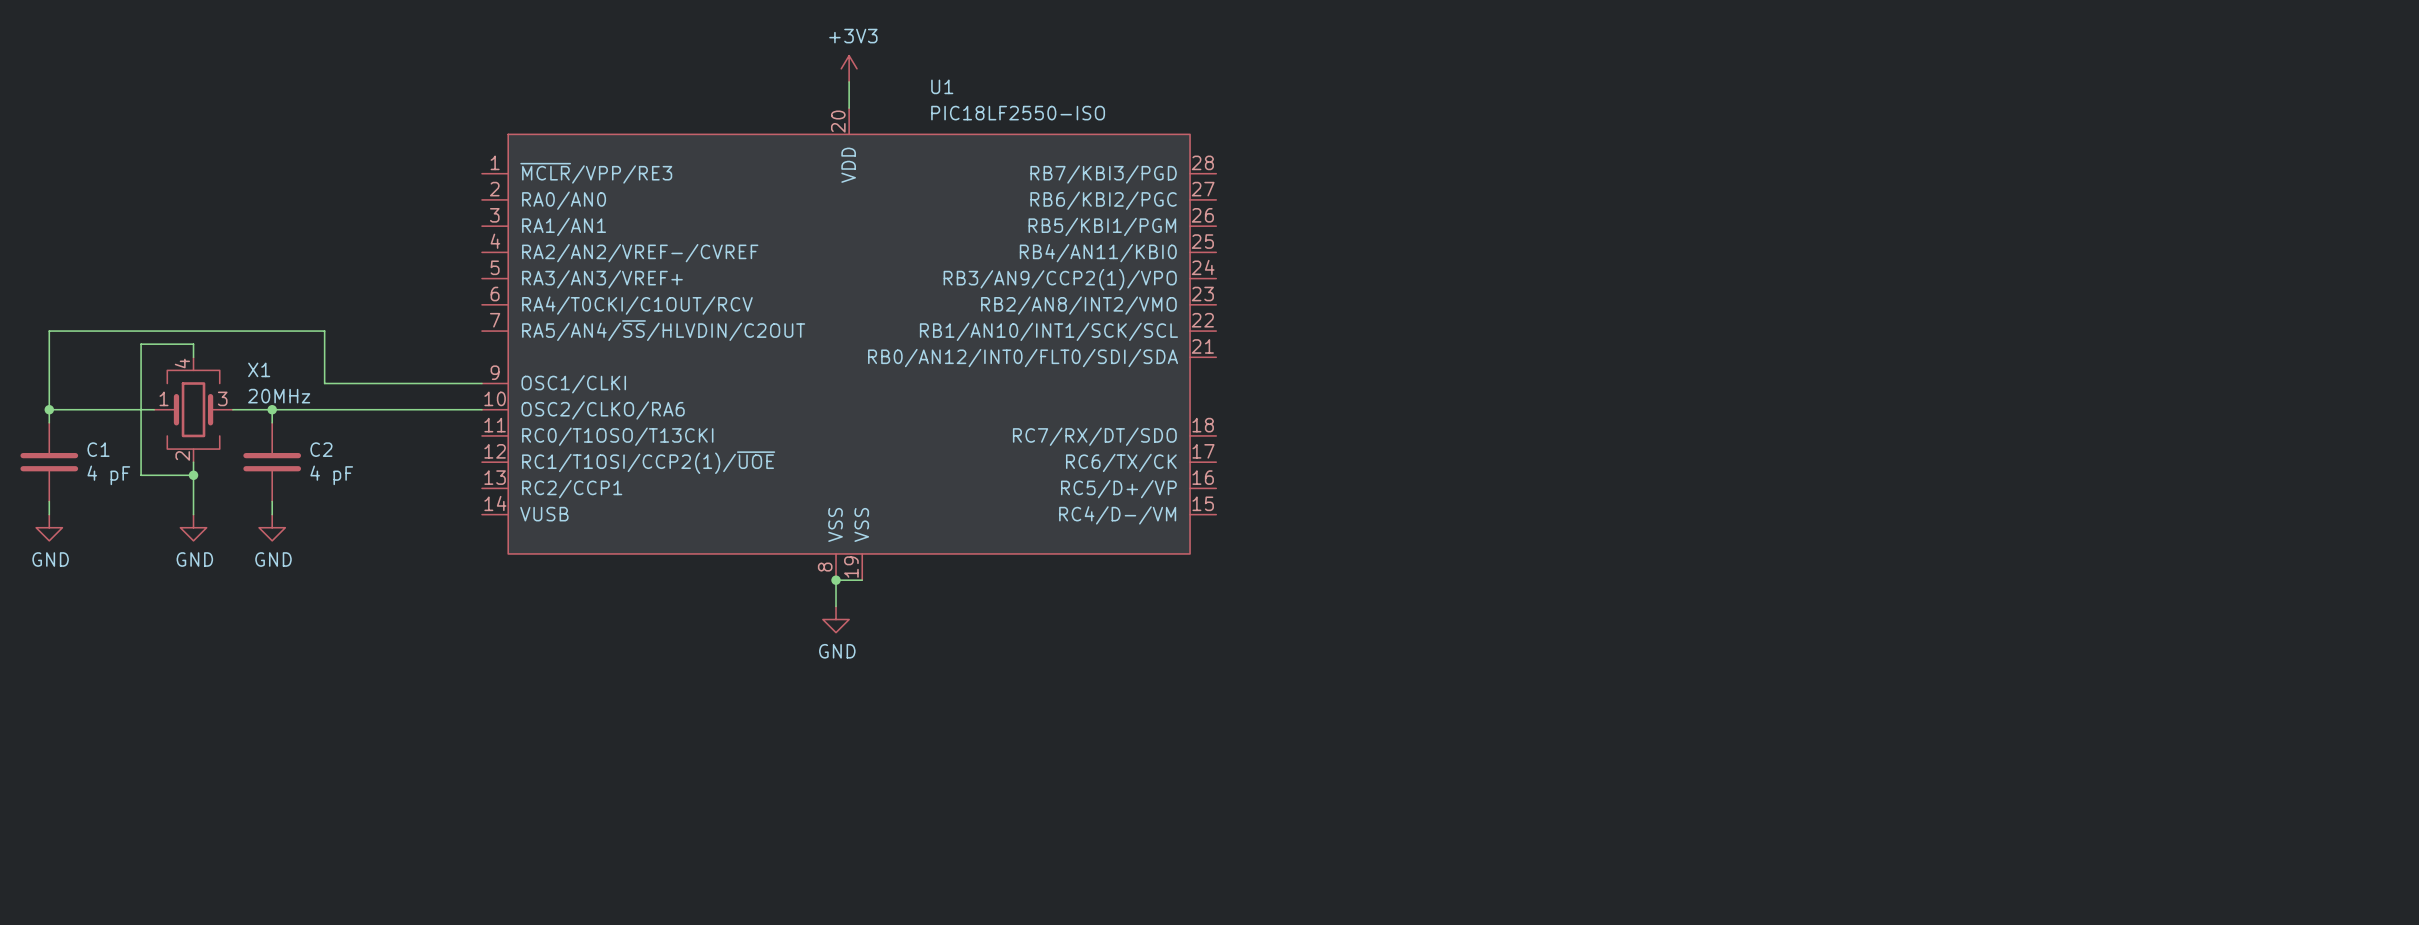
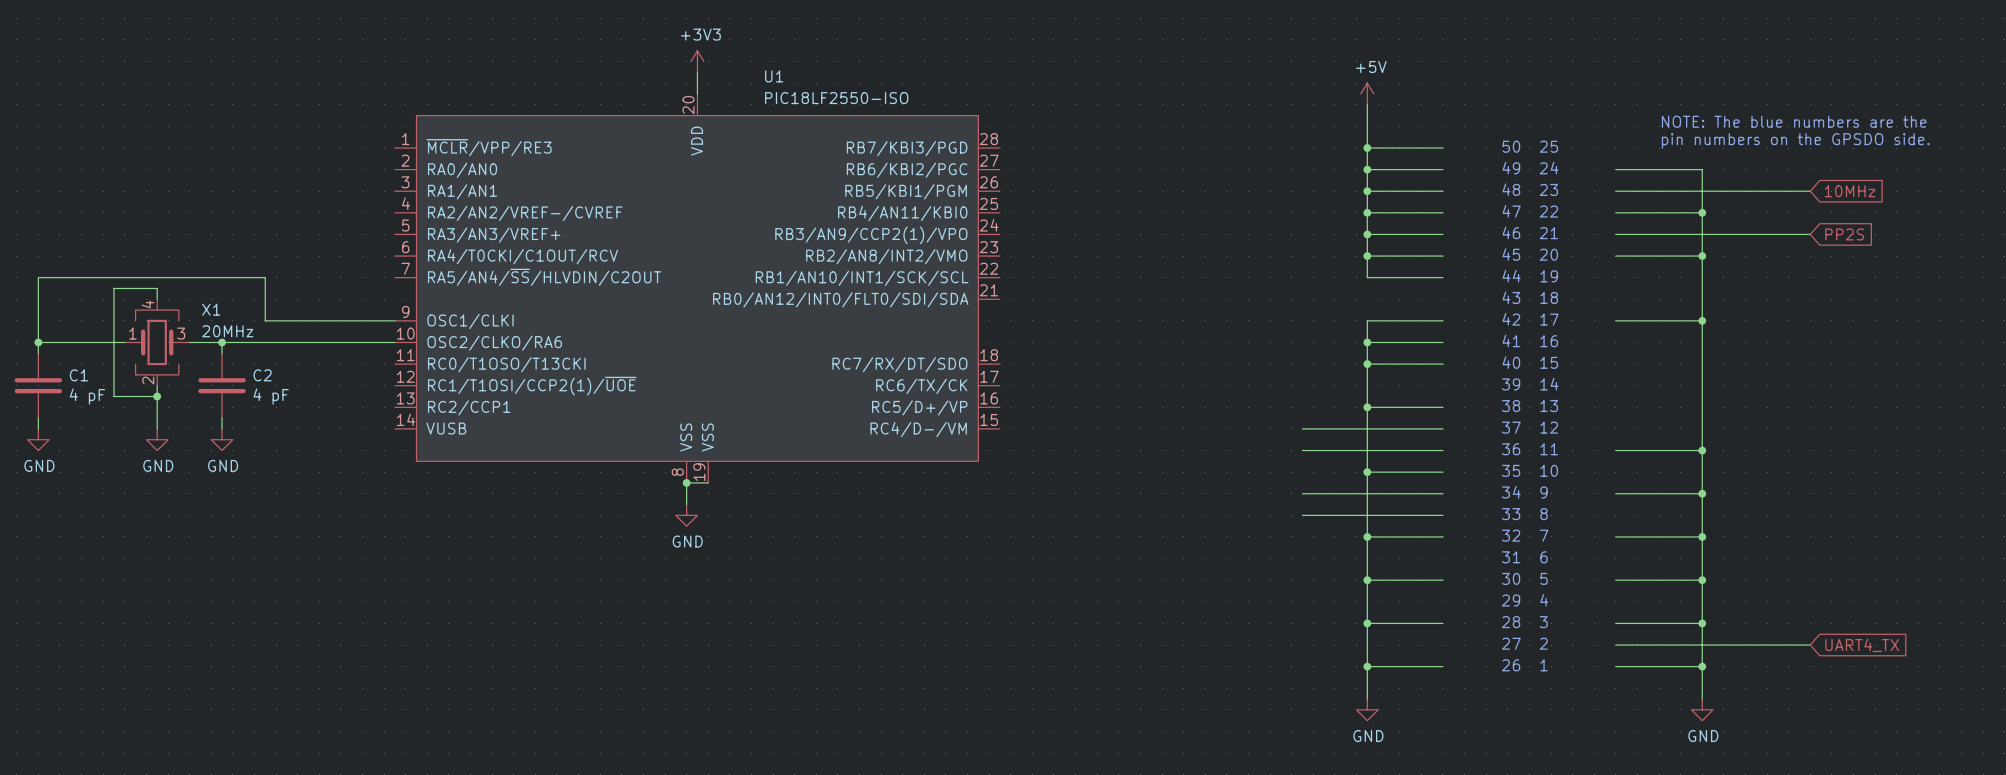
power symbol: none -> +5V (1367, 93)
wire: none -> (1367, 104) (1367, 277) (1442, 277)
text: none -> NOTE: The blue numbers are the (1794, 121)
text: none -> pin numbers on the GPSDO side. (1795, 140)
text: none -> 50 (1511, 146)
text: none -> 25 (1548, 146)
wire: none -> (1367, 148) (1442, 148)
junction: none -> (1367, 148)
text: none -> 49 (1511, 168)
text: none -> 24 (1549, 168)
wire: none -> (1367, 169) (1442, 169)
junction: none -> (1367, 169)
wire: none -> (1615, 169) (1702, 169) (1702, 699)
text: none -> 48 (1511, 189)
text: none -> 23 (1548, 189)
wire: none -> (1367, 191) (1442, 191)
junction: none -> (1367, 191)
wire: none -> (1615, 191) (1810, 191)
global label: none -> 10MHz (1850, 191)
text: none -> 47 (1511, 211)
text: none -> 22 (1548, 211)
wire: none -> (1367, 212) (1442, 212)
junction: none -> (1367, 212)
wire: none -> (1615, 212) (1702, 212)
junction: none -> (1702, 212)
text: none -> 46 (1511, 232)
text: none -> 21 (1548, 233)
wire: none -> (1367, 234) (1442, 234)
junction: none -> (1367, 234)
wire: none -> (1615, 234) (1810, 234)
global label: none -> PP2S (1844, 234)
text: none -> 45 (1511, 254)
text: none -> 20 (1548, 254)
wire: none -> (1367, 256) (1442, 256)
junction: none -> (1367, 256)
wire: none -> (1615, 256) (1702, 256)
junction: none -> (1702, 256)
text: none -> 44 (1511, 276)
text: none -> 19 (1549, 276)
text: none -> 43 (1511, 297)
text: none -> 18 (1549, 297)
text: none -> 42 (1511, 319)
text: none -> 17 (1549, 319)
wire: none -> (1442, 320) (1367, 320) (1367, 699)
wire: none -> (1615, 320) (1702, 320)
junction: none -> (1702, 320)
text: none -> 41 (1511, 340)
text: none -> 16 (1549, 341)
wire: none -> (1367, 342) (1442, 342)
junction: none -> (1367, 342)
text: none -> 40 (1511, 362)
text: none -> 15 (1549, 362)
wire: none -> (1367, 364) (1442, 364)
junction: none -> (1367, 364)
text: none -> 39 (1511, 384)
text: none -> 14 (1549, 384)
text: none -> 38 (1511, 406)
text: none -> 13 (1549, 406)
wire: none -> (1367, 407) (1442, 407)
junction: none -> (1367, 407)
text: none -> 37 (1511, 427)
text: none -> 12 (1549, 427)
wire: none -> (1302, 428) (1442, 428)
text: none -> 36 (1511, 449)
text: none -> 11 (1549, 449)
wire: none -> (1302, 450) (1442, 450)
wire: none -> (1615, 450) (1702, 450)
junction: none -> (1702, 450)
text: none -> 35 (1511, 470)
text: none -> 10 (1549, 470)
wire: none -> (1367, 472) (1442, 472)
junction: none -> (1367, 472)
text: none -> 34 (1511, 492)
text: none -> 9 (1544, 492)
wire: none -> (1302, 493) (1442, 493)
wire: none -> (1615, 493) (1702, 493)
junction: none -> (1702, 493)
text: none -> 33 (1511, 514)
text: none -> 8 (1544, 514)
wire: none -> (1302, 515) (1442, 515)
text: none -> 32 (1511, 535)
text: none -> 7 (1544, 535)
wire: none -> (1367, 536) (1442, 536)
junction: none -> (1367, 536)
wire: none -> (1615, 536) (1702, 536)
junction: none -> (1702, 536)
text: none -> 31 (1511, 557)
text: none -> 6 (1544, 557)
text: none -> 30 (1511, 578)
text: none -> 5 (1544, 578)
wire: none -> (1367, 580) (1442, 580)
junction: none -> (1367, 580)
wire: none -> (1615, 580) (1702, 580)
junction: none -> (1702, 580)
text: none -> 29 (1511, 600)
text: none -> 4 (1544, 600)
text: none -> 28 (1511, 622)
text: none -> 3 (1543, 622)
wire: none -> (1367, 623) (1442, 623)
junction: none -> (1367, 623)
wire: none -> (1615, 623) (1702, 623)
junction: none -> (1702, 623)
text: none -> 27 (1511, 643)
text: none -> 2 (1543, 643)
wire: none -> (1615, 645) (1810, 645)
global label: none -> UART4_TX (1862, 645)
text: none -> 26 (1511, 665)
text: none -> 1 (1544, 665)
wire: none -> (1367, 666) (1442, 666)
junction: none -> (1367, 666)
wire: none -> (1615, 666) (1702, 666)
junction: none -> (1702, 666)
power symbol: none -> GND (1367, 709)
power symbol: none -> GND (1702, 709)

